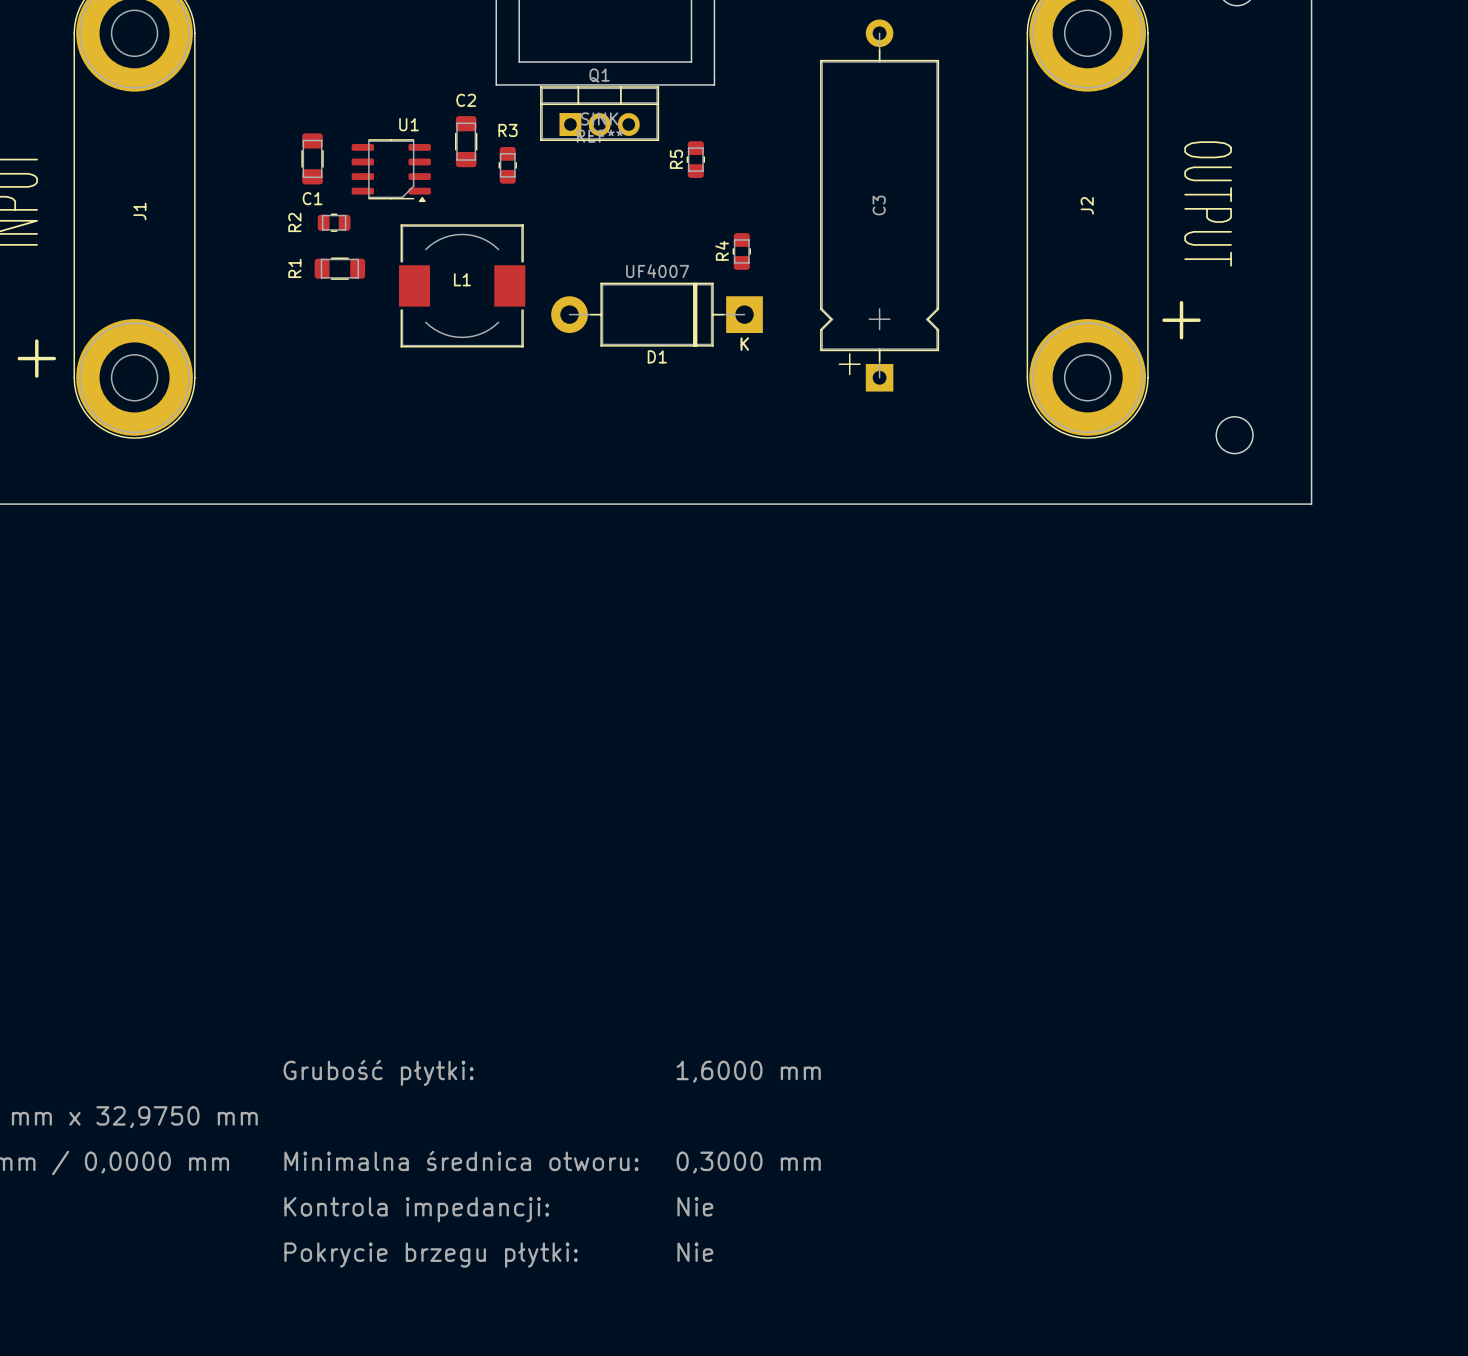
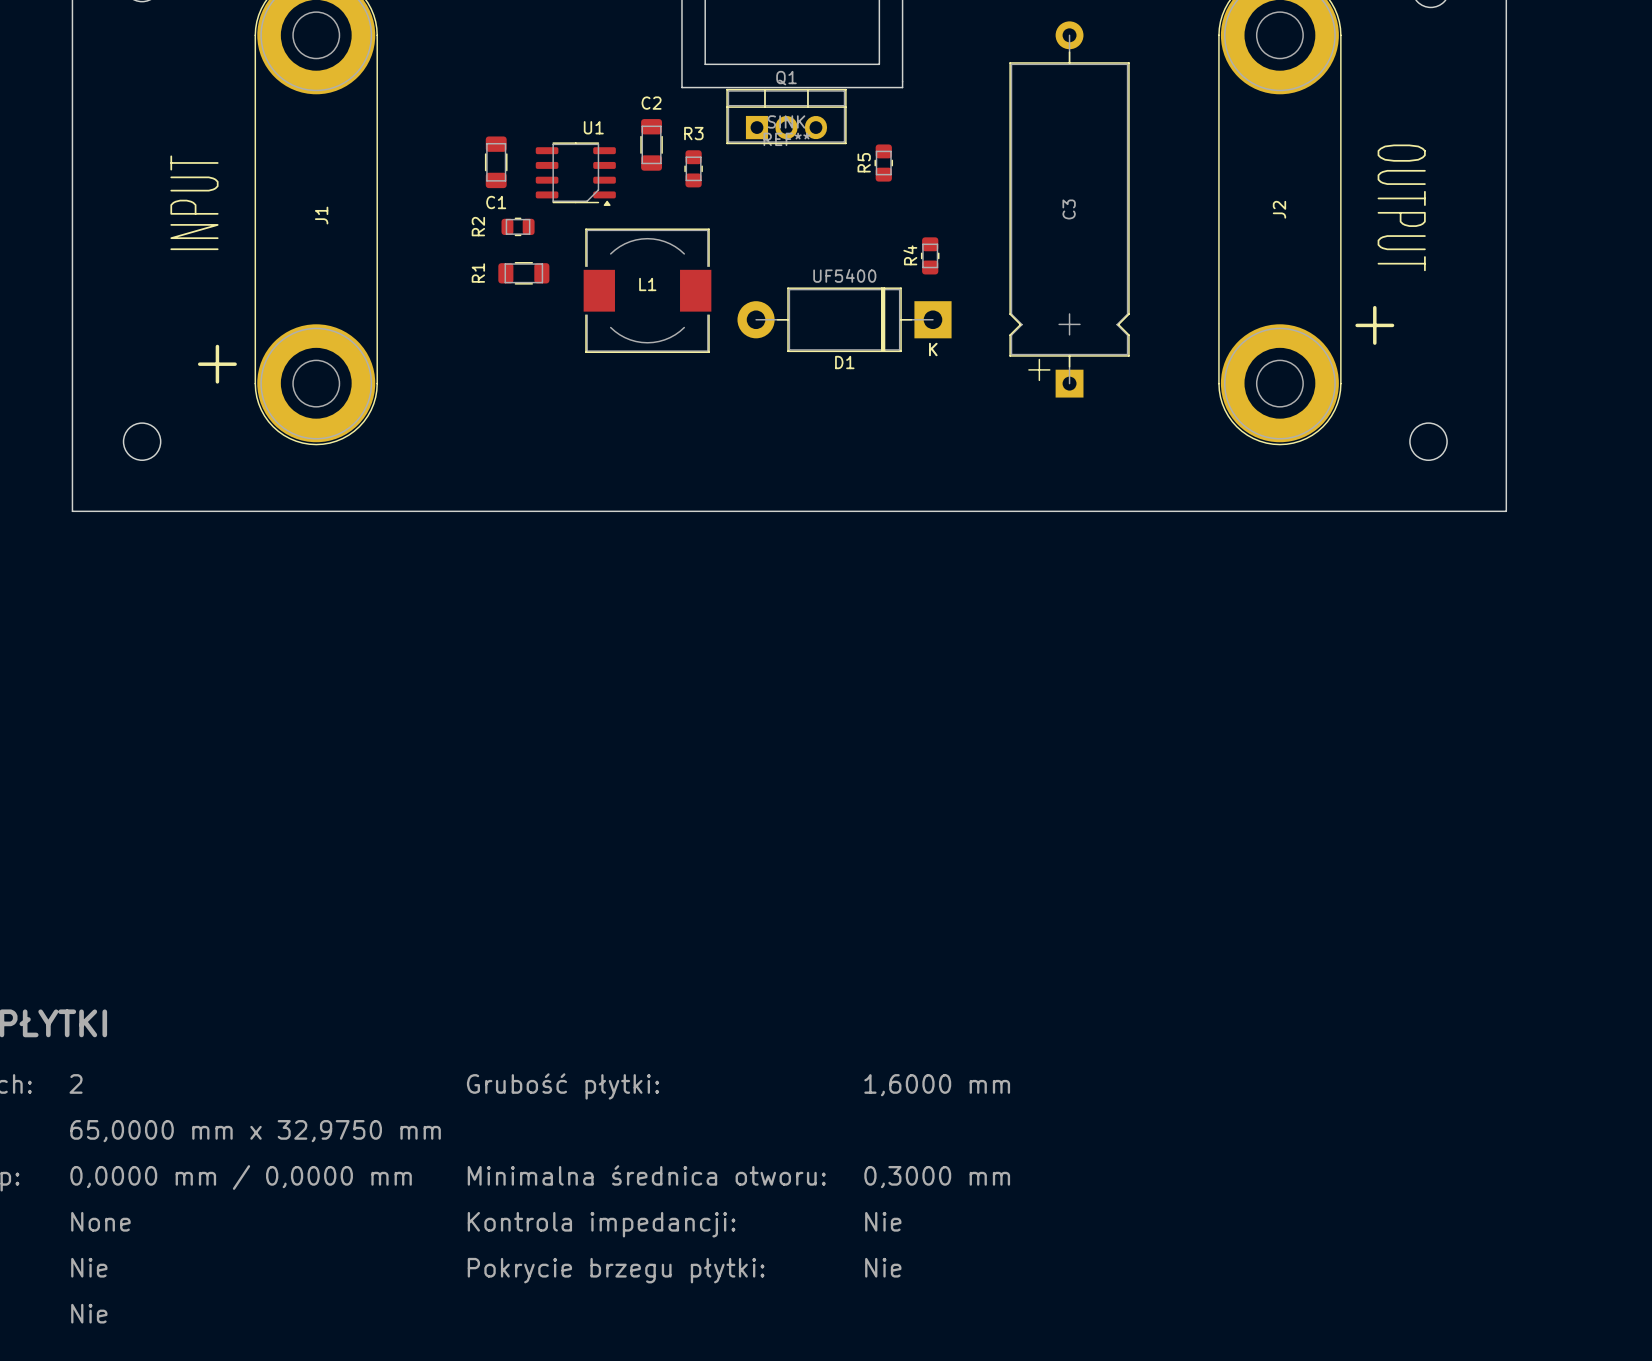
D1 value: UF4007 (657, 271) -> UF5400 (844, 275)

